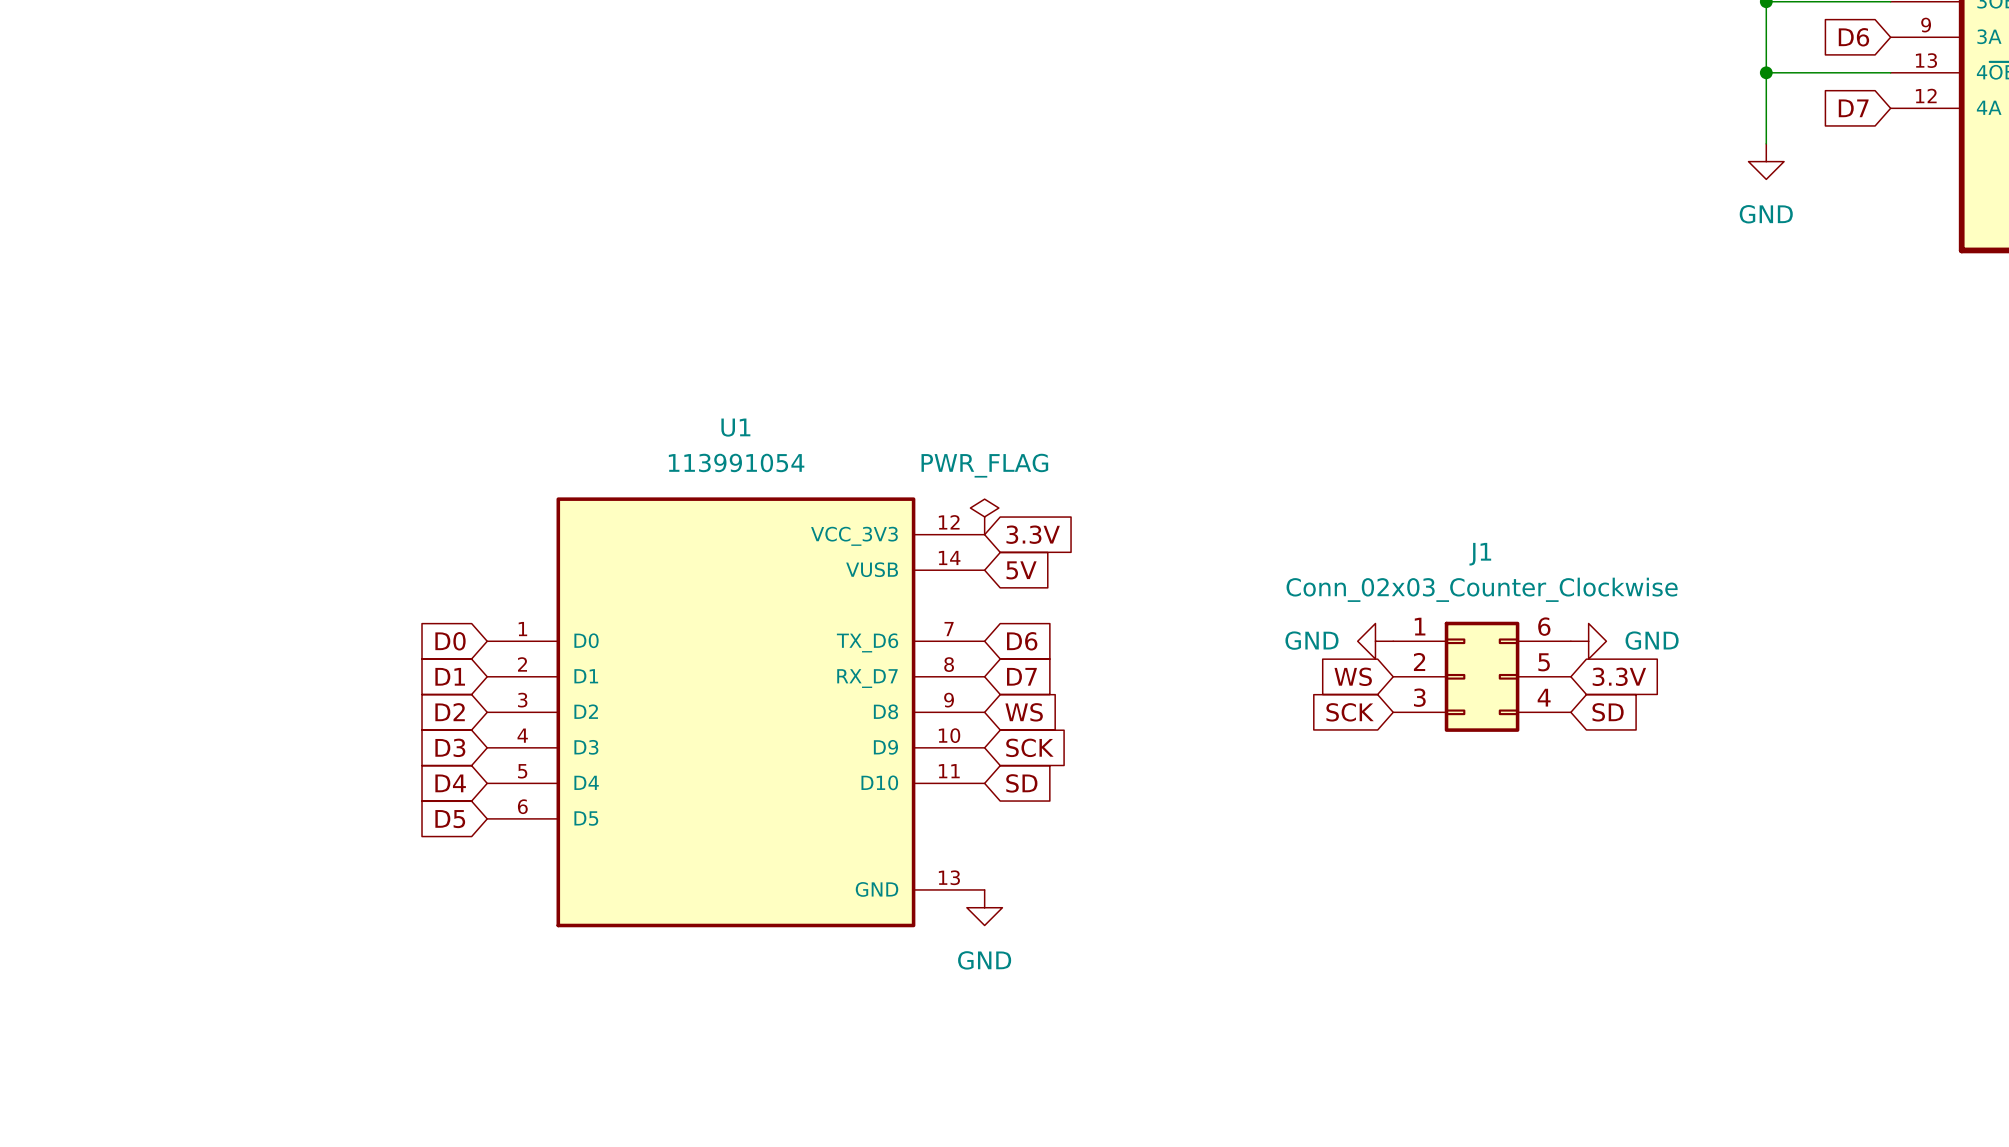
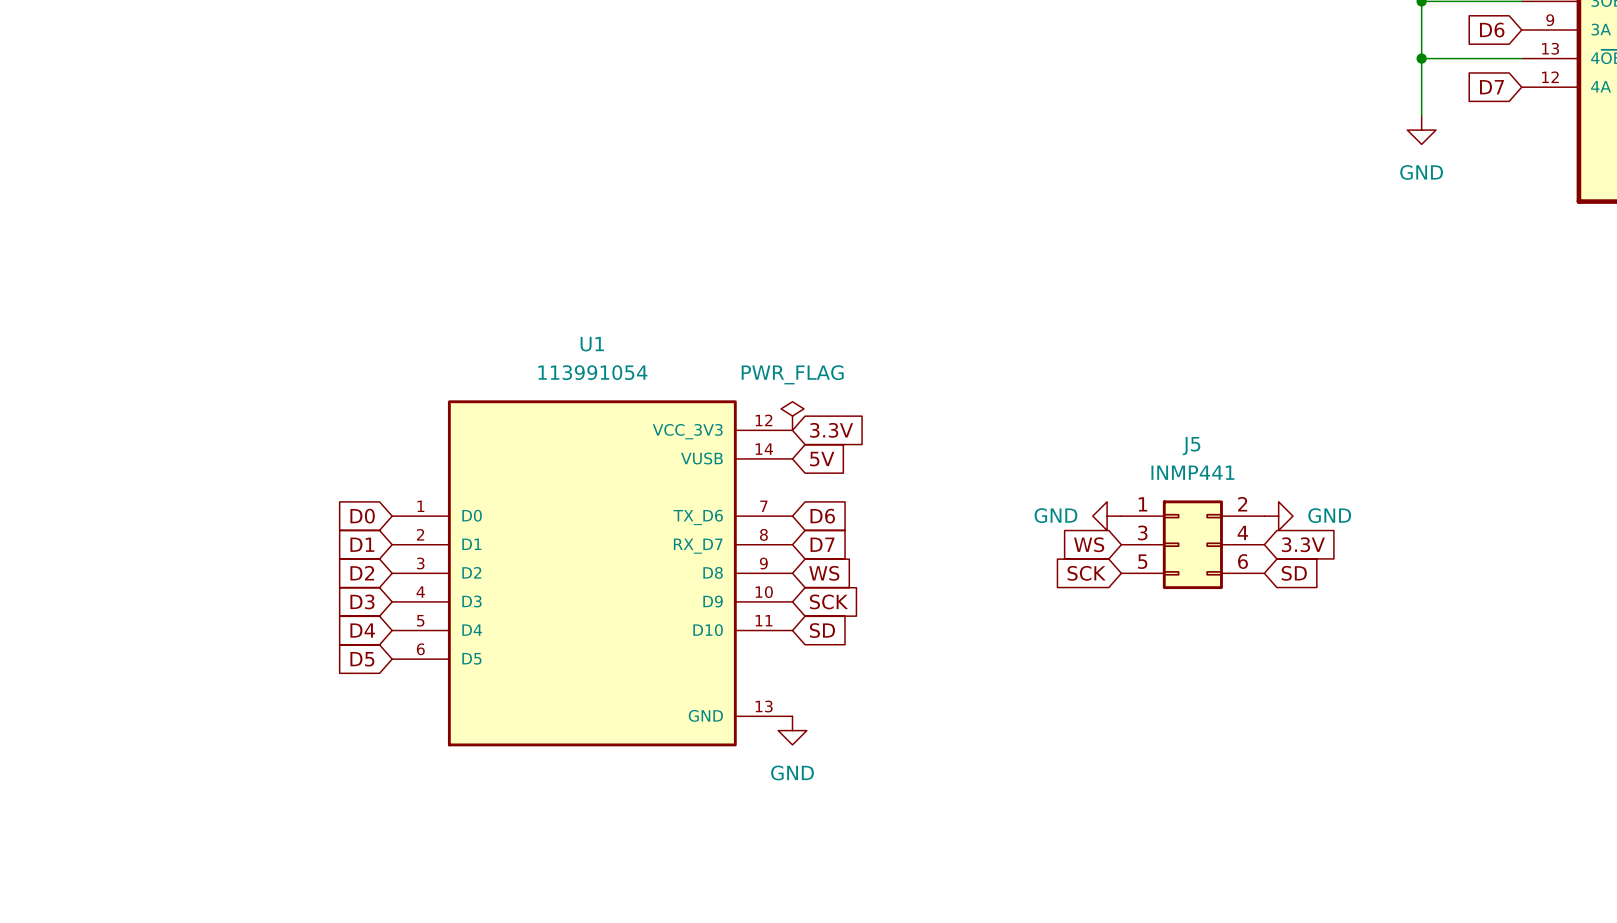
J1 name: J1 (1480, 554) -> J5 (1191, 446)
J1 value: Conn_02x03_Counter_Clockwise (1482, 589) -> INMP441 (1192, 472)
J1 pin number: 6 (1544, 626) -> 2 (1242, 504)
J1 pin number: 2 (1419, 661) -> 3 (1142, 532)
J1 pin number: 5 (1544, 662) -> 4 (1242, 532)
J1 pin number: 3 (1419, 697) -> 5 (1142, 561)
J1 pin number: 4 (1544, 697) -> 6 (1242, 561)

